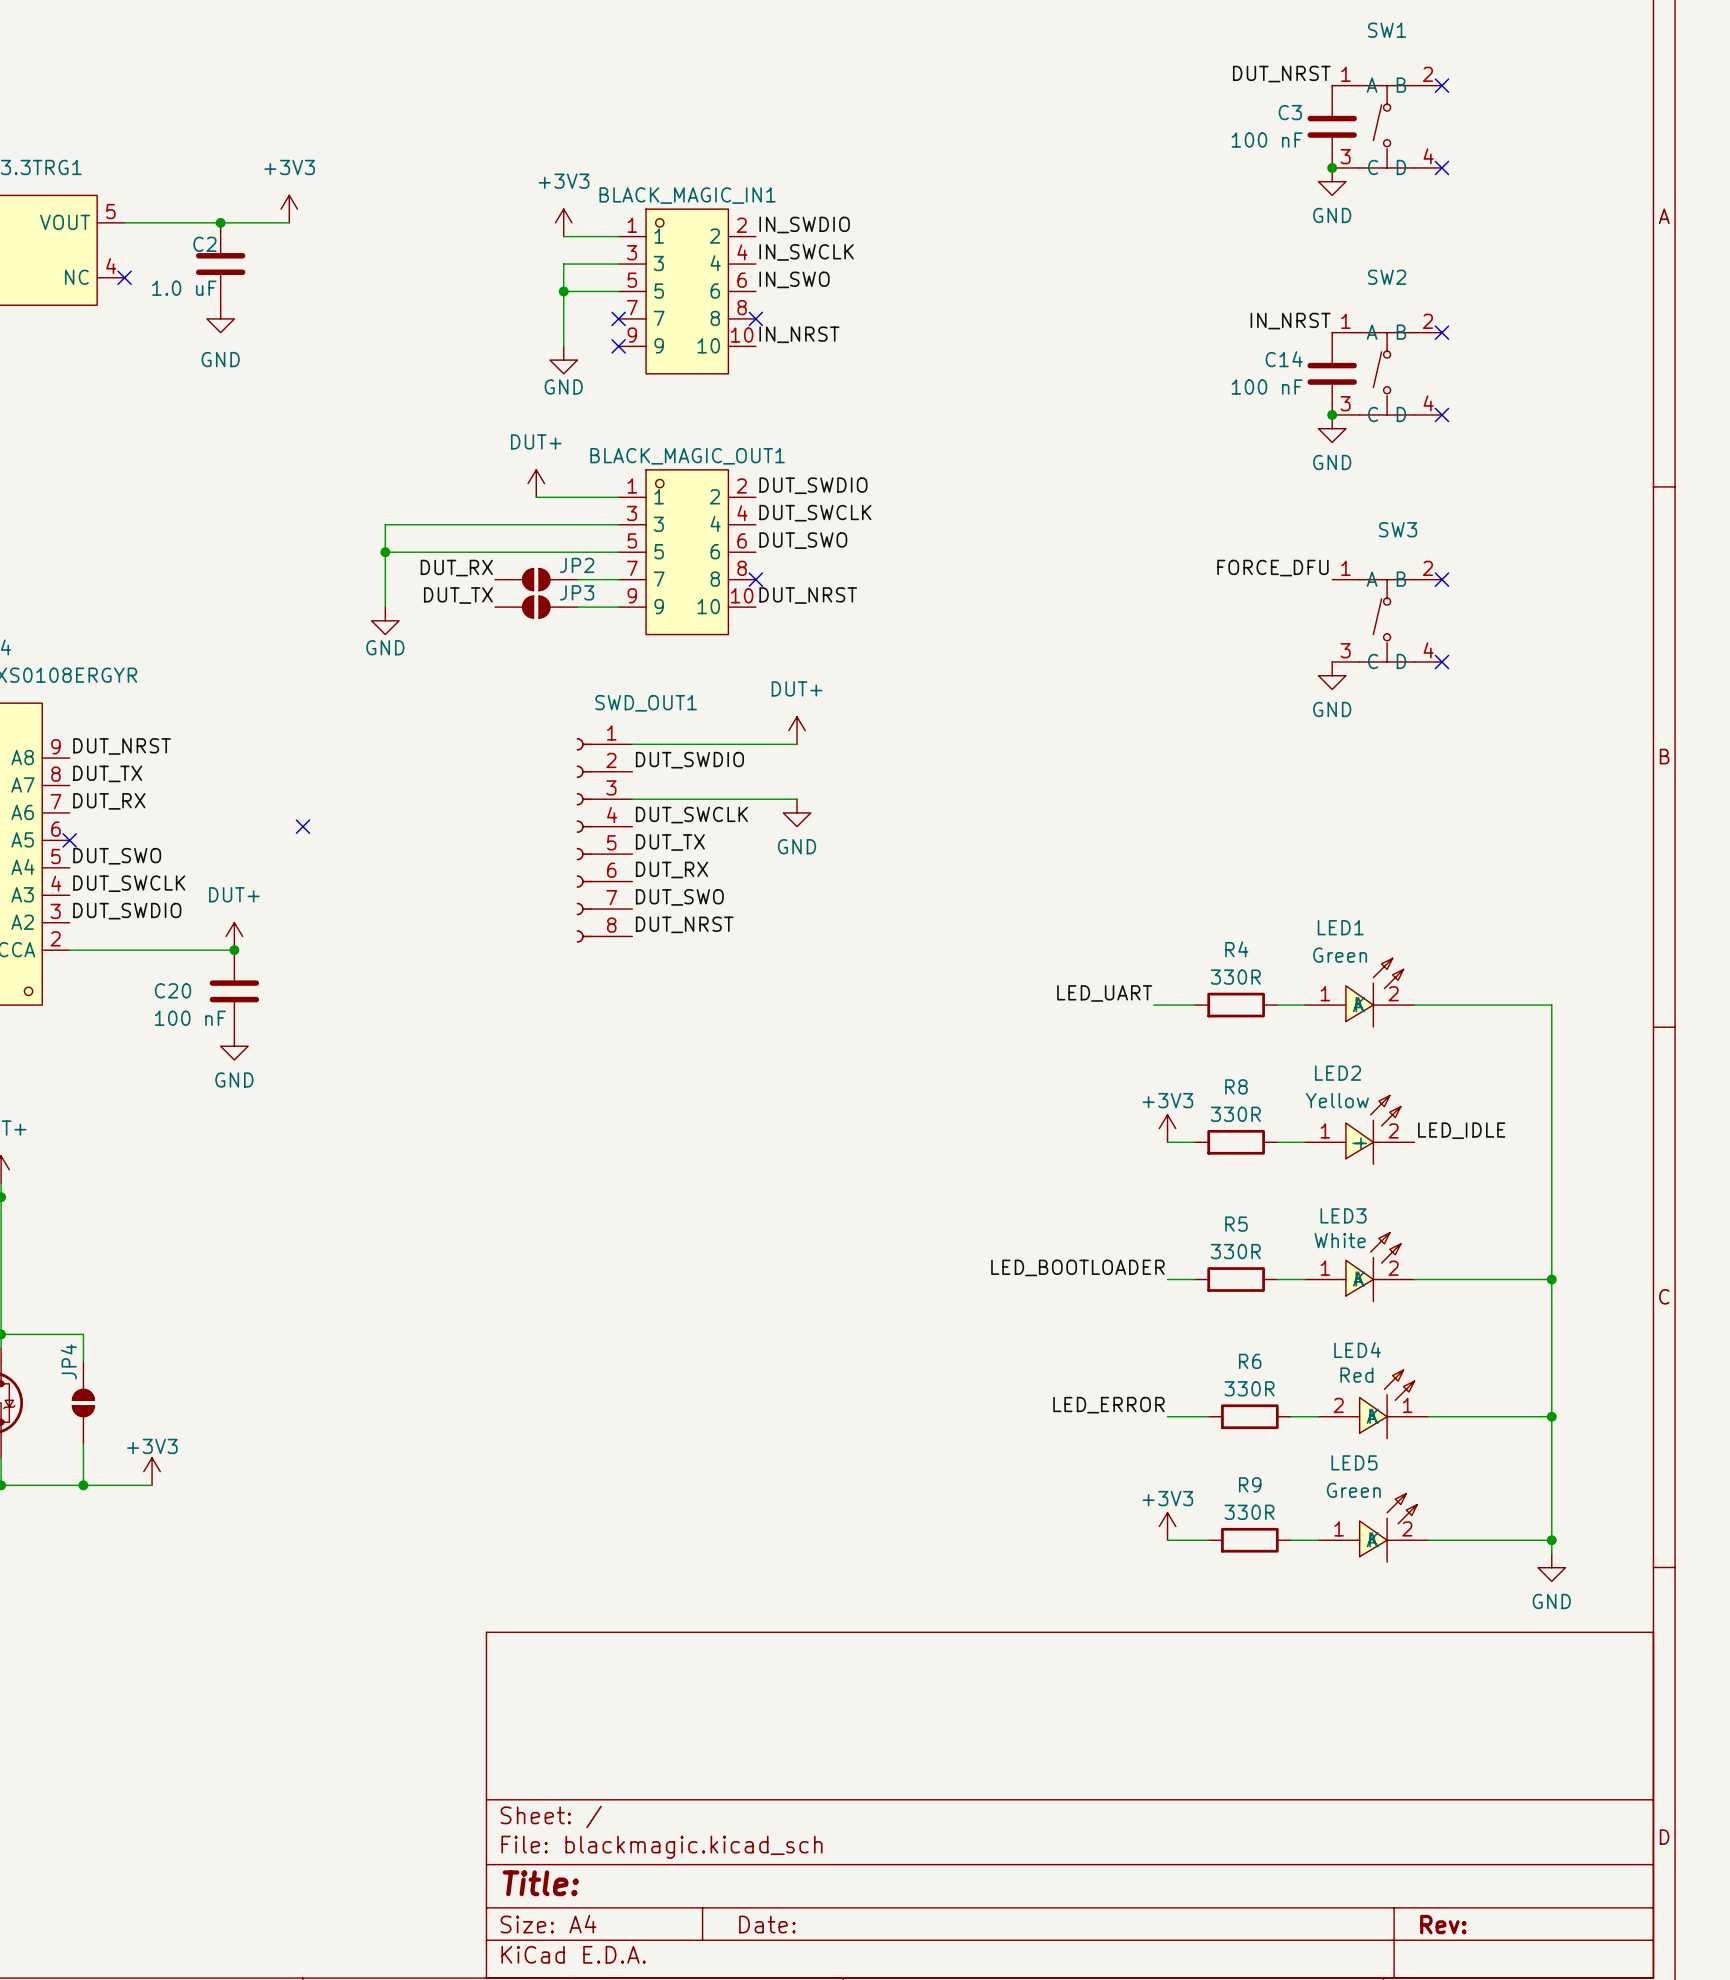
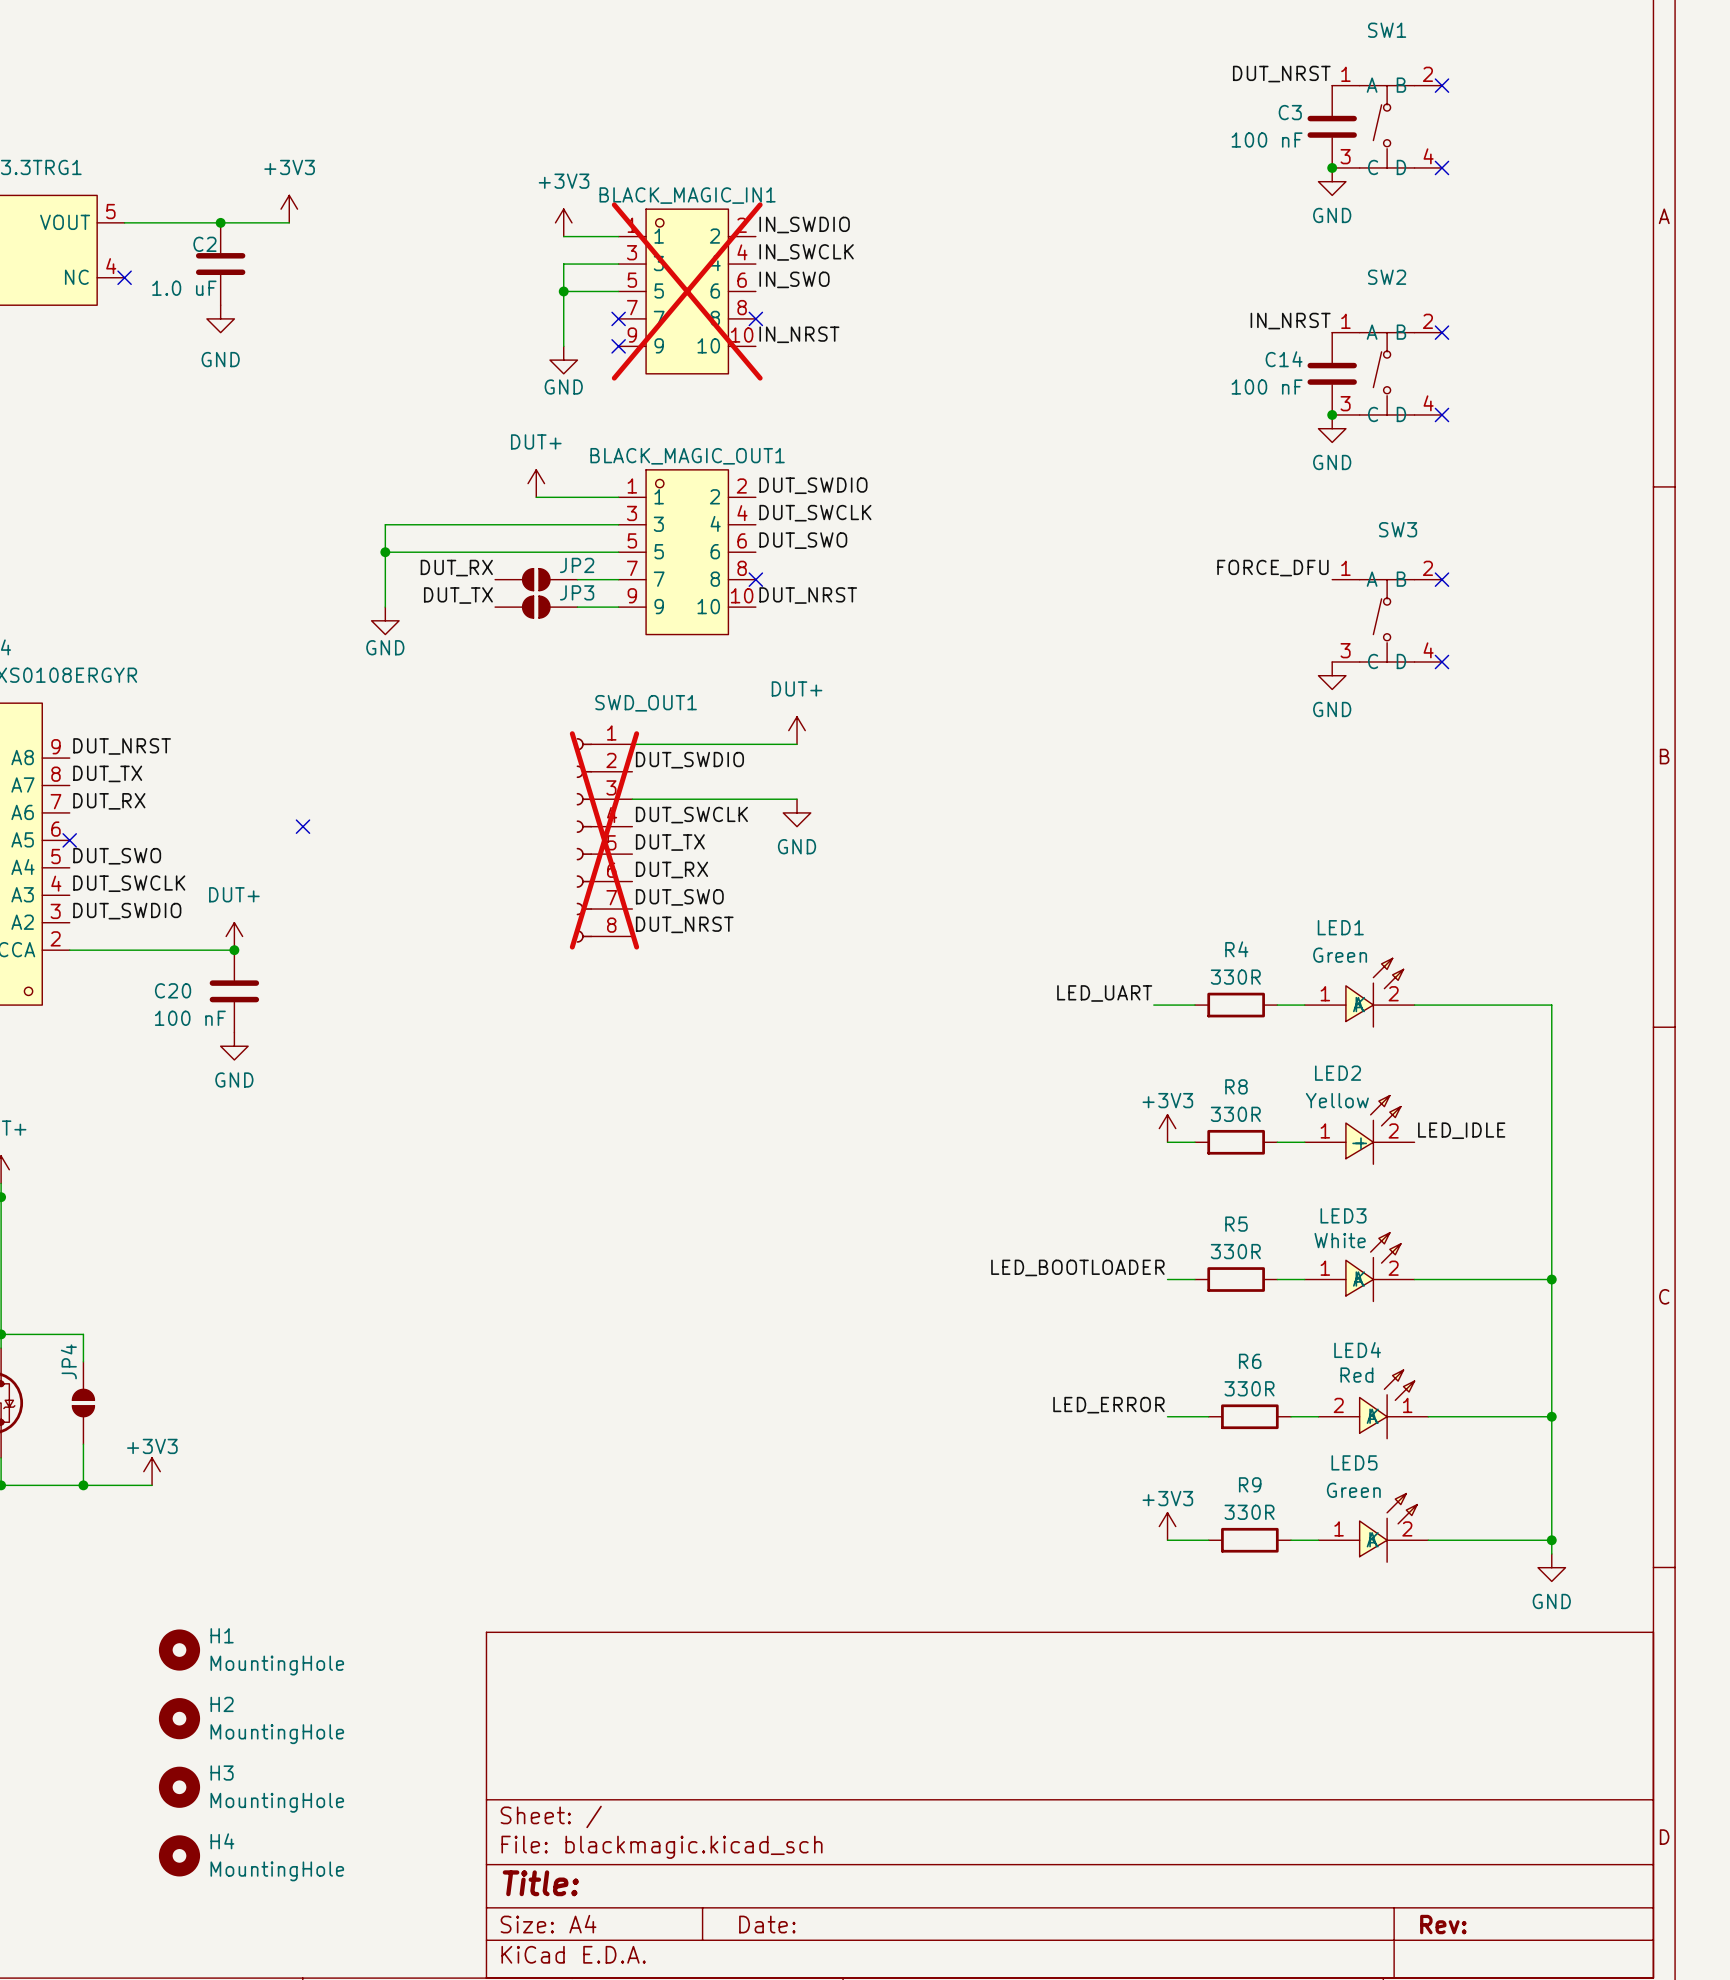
BLACK_MAGIC_IN1 do-not-place cross: none -> (687, 291)
SWD_OUT1 do-not-place cross: none -> (604, 840)
H1: none -> MountingHole (179, 1650)
H2: none -> MountingHole (179, 1718)
H3: none -> MountingHole (179, 1787)
H4: none -> MountingHole (179, 1855)

